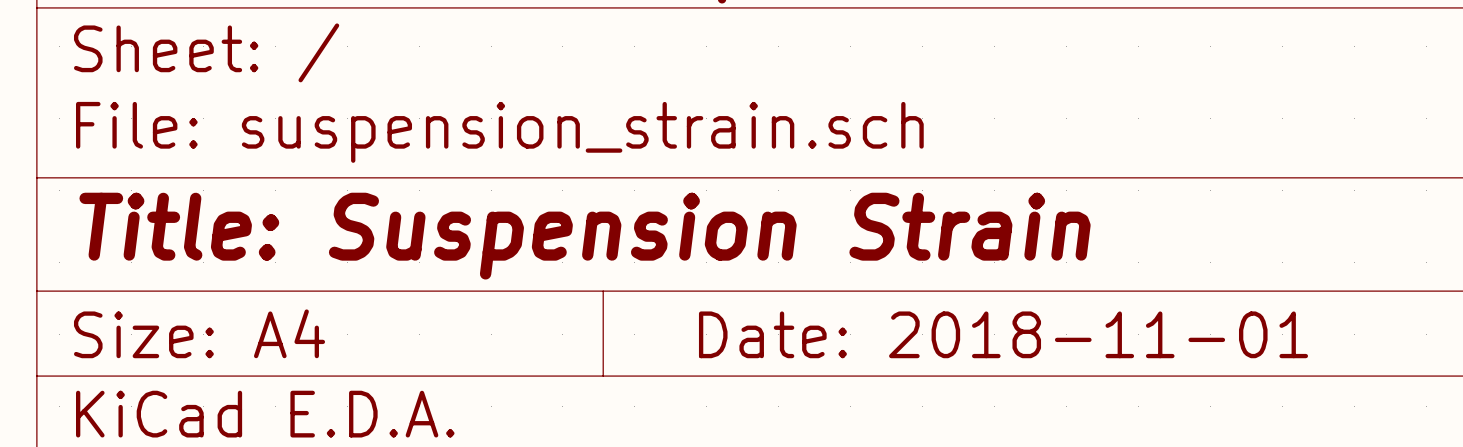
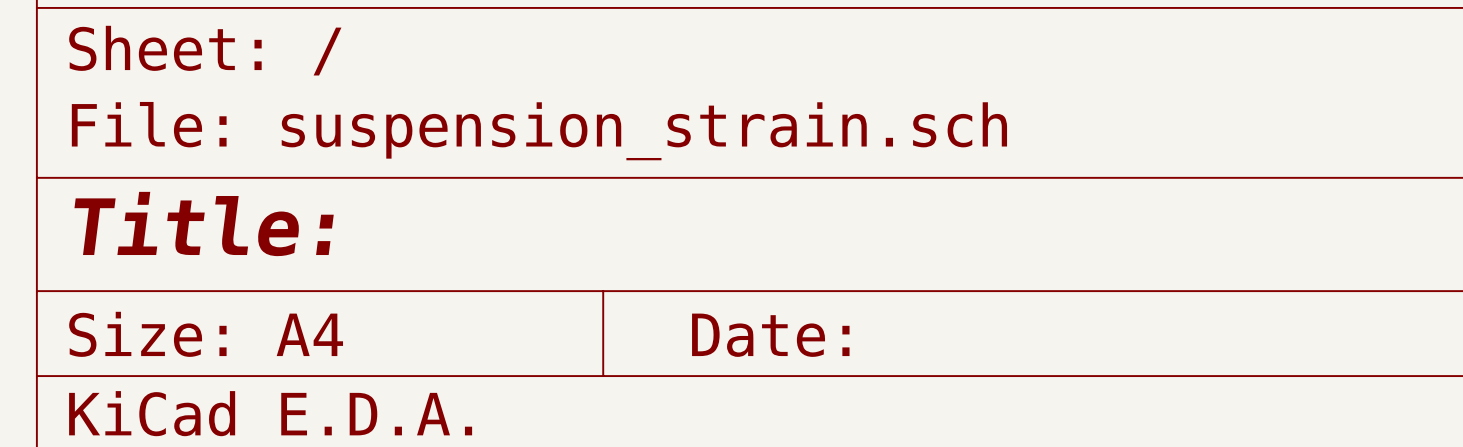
title block: Title: Suspension Strain (585, 236) -> Title: (204, 223)
title block: Date: 2018-11-01 (1003, 334) -> Date: (770, 335)

